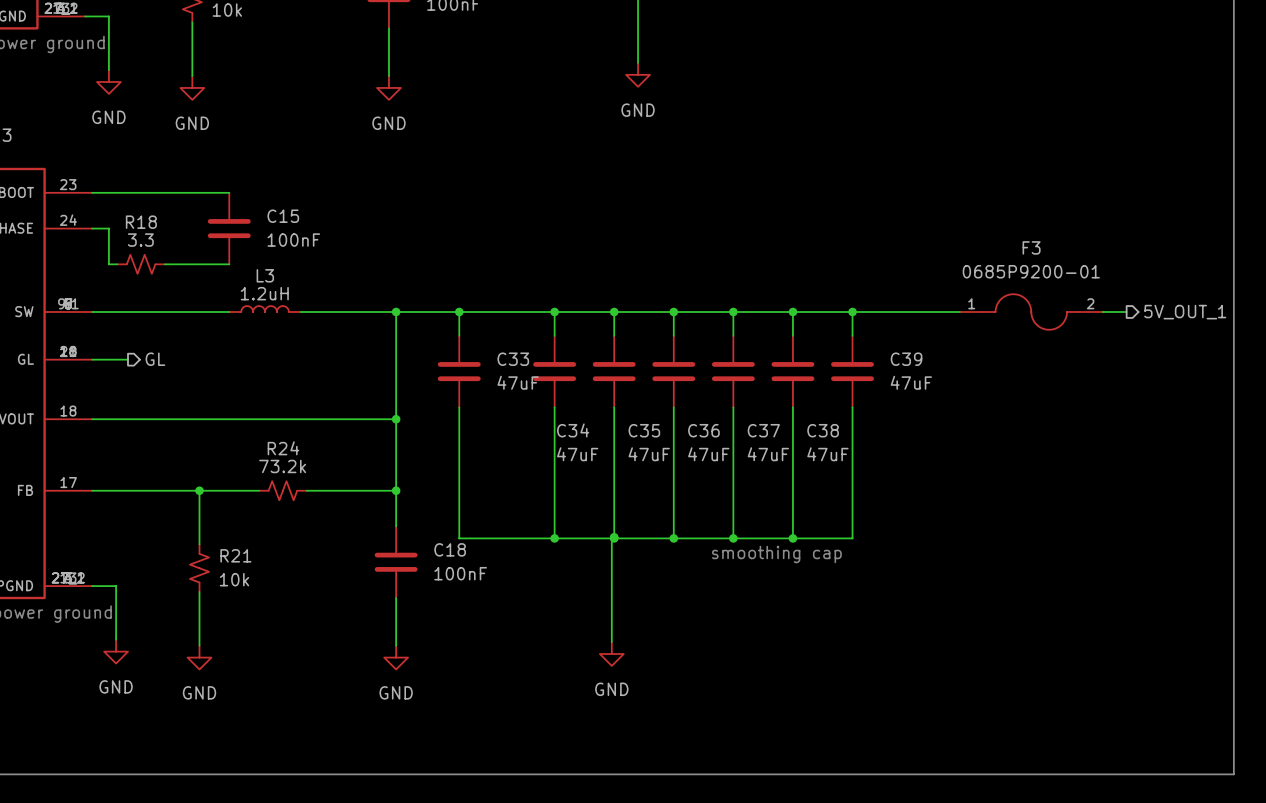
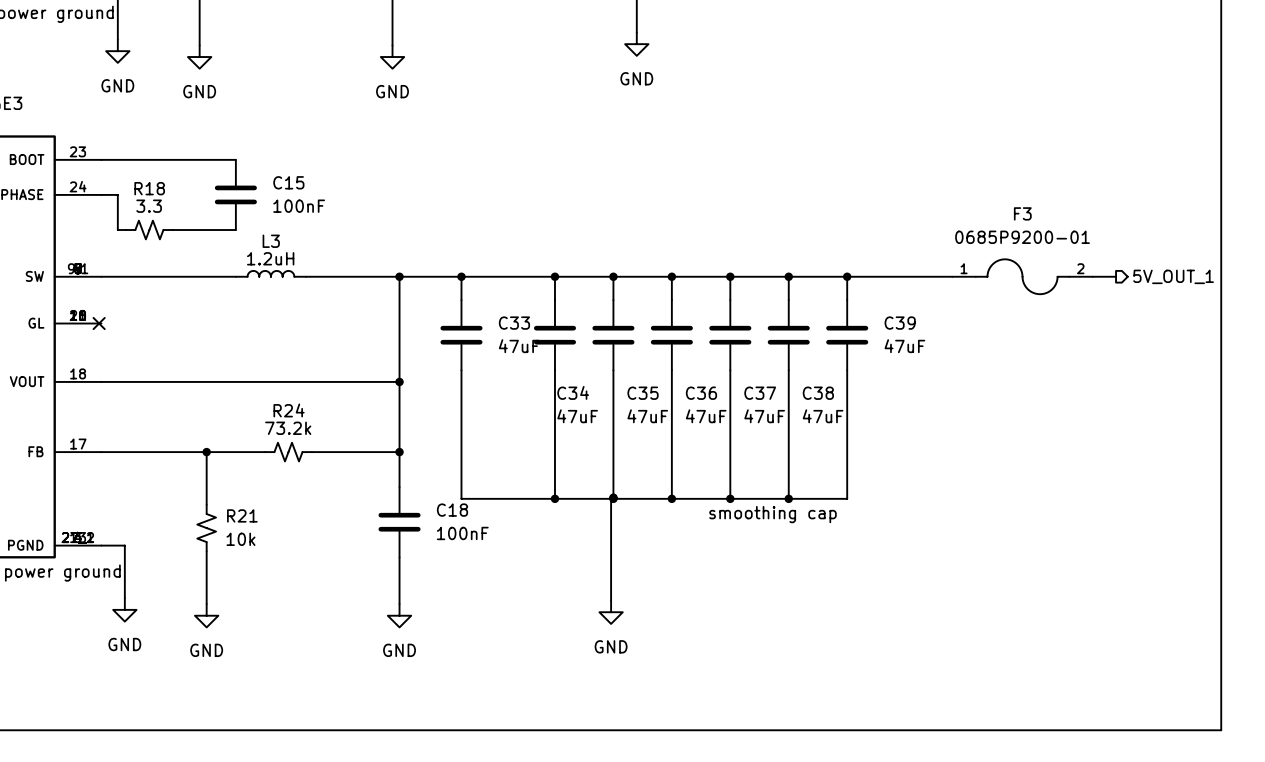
no-connect mark: none -> (99, 323)
wire: (92, 359) (128, 359) -> none
hierarchical label: GL (155, 359) -> none

